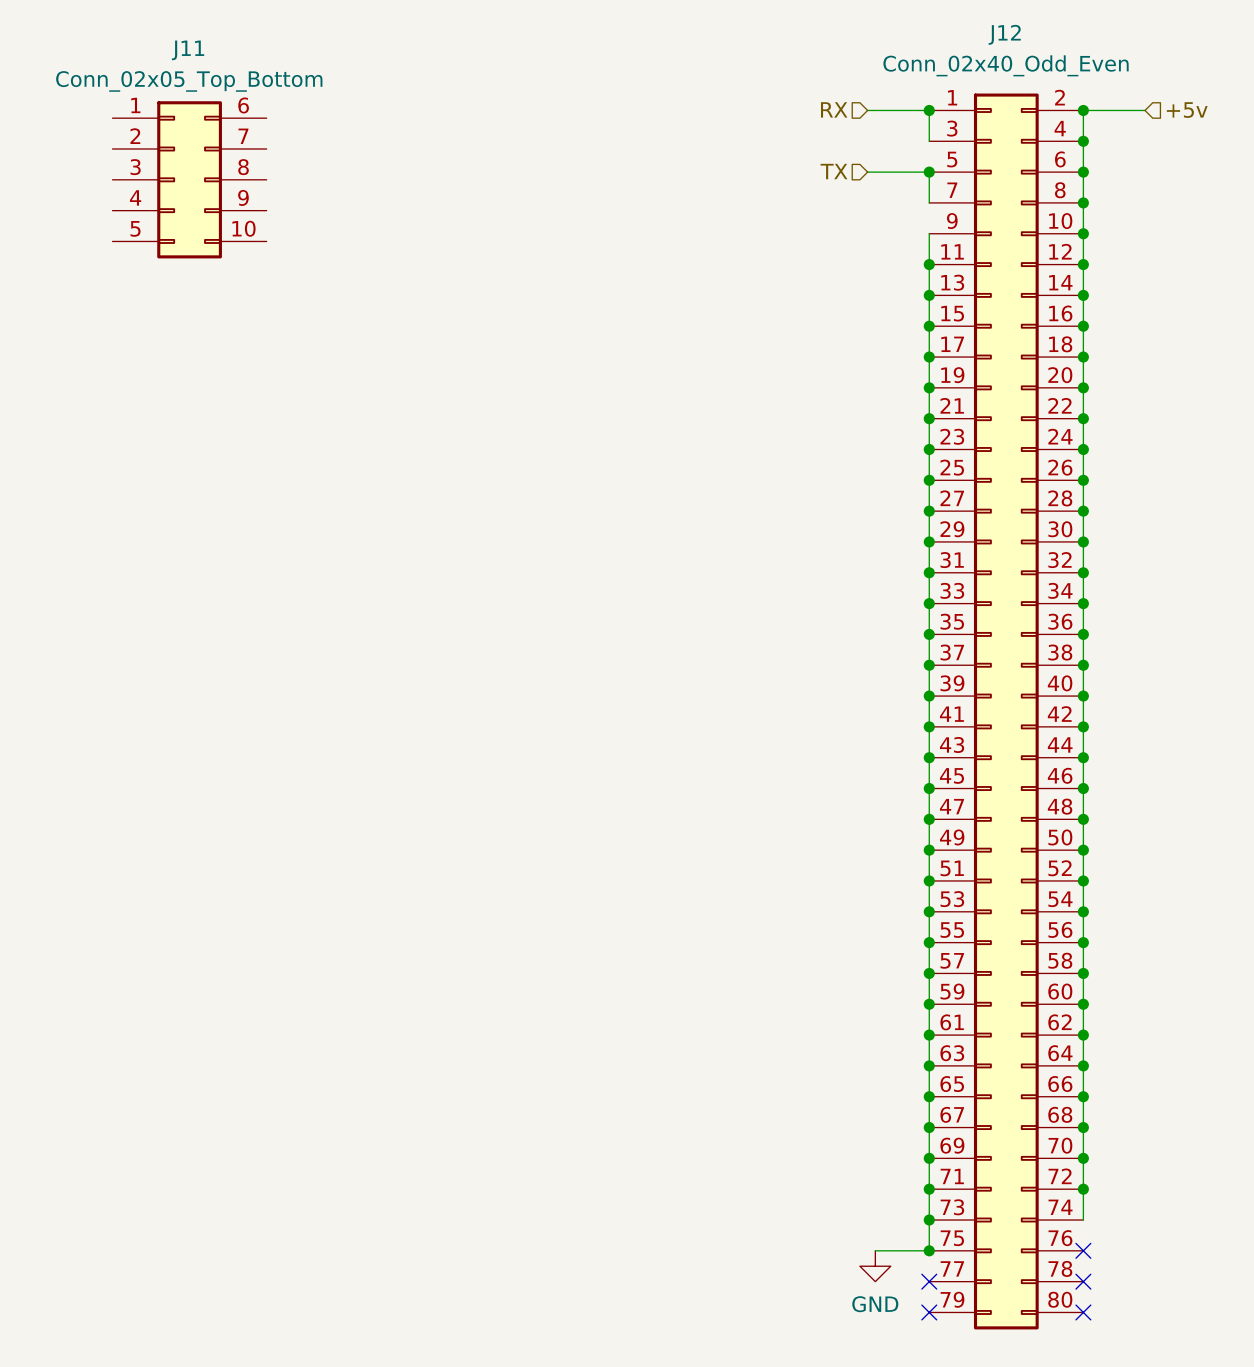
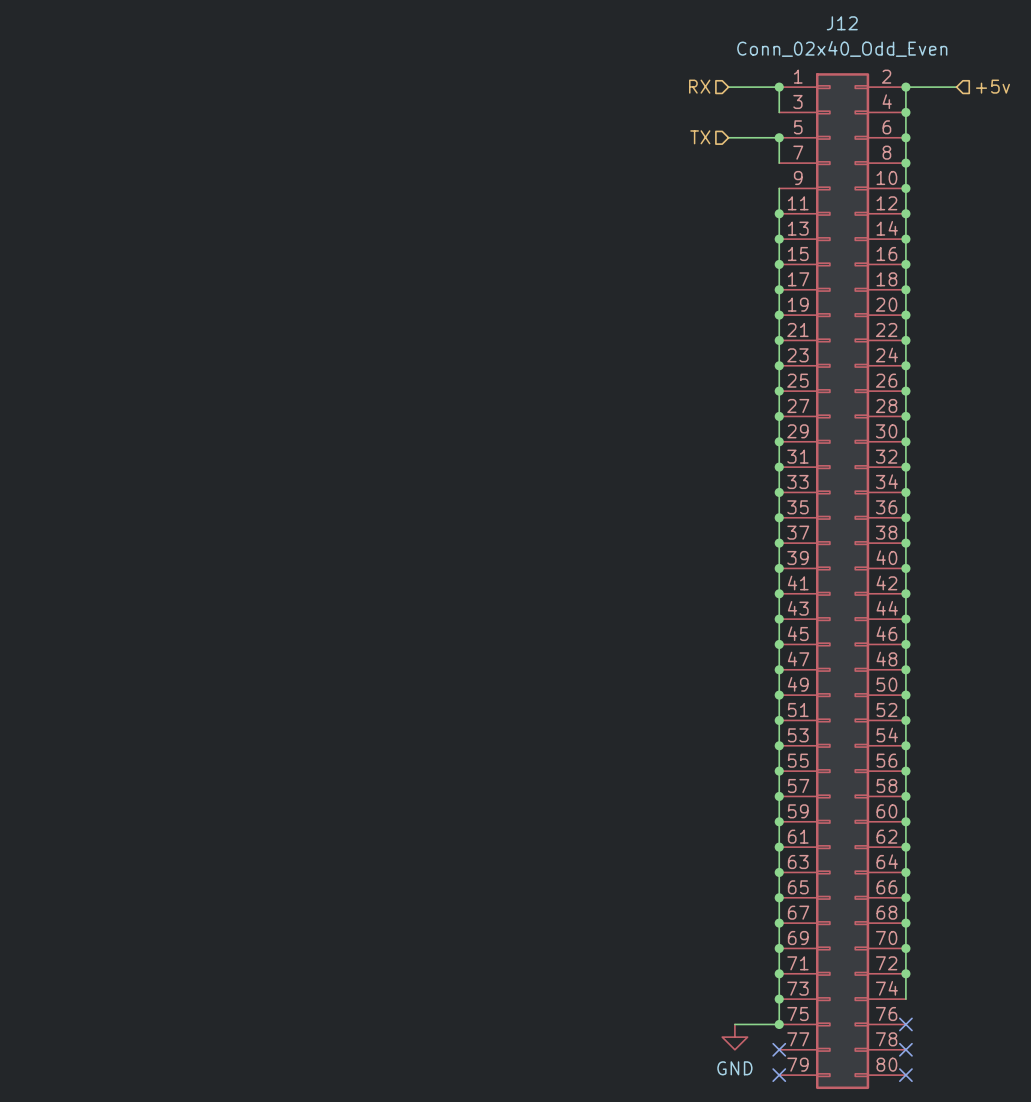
J11: Conn_02x05_Top_Bottom (189, 179) -> none

